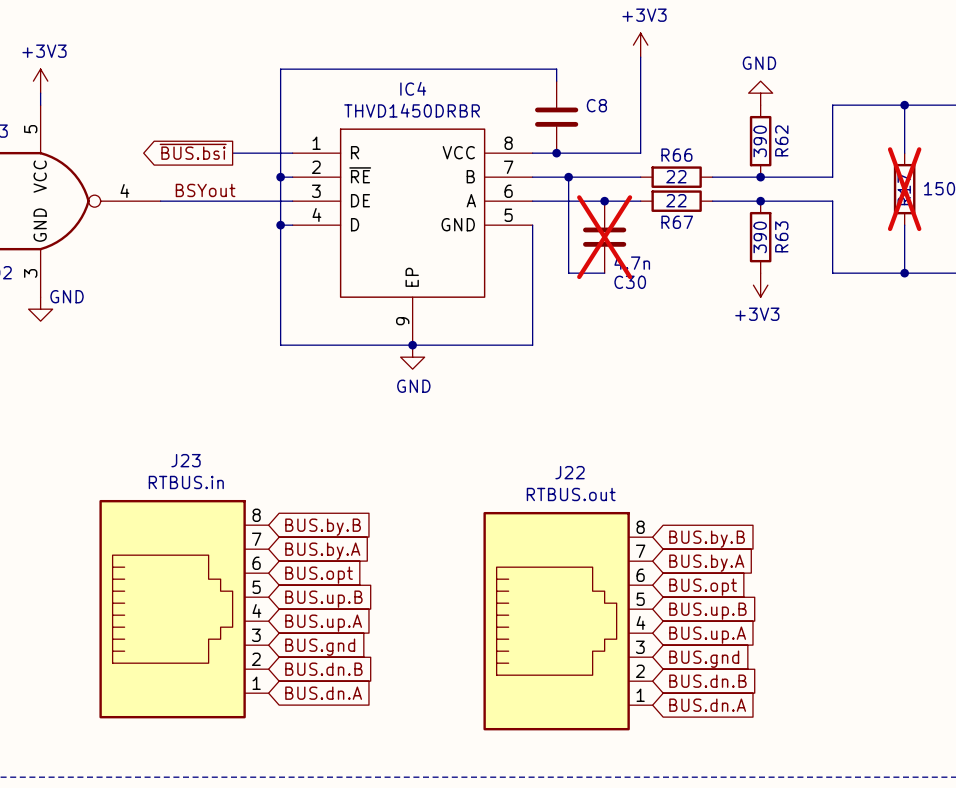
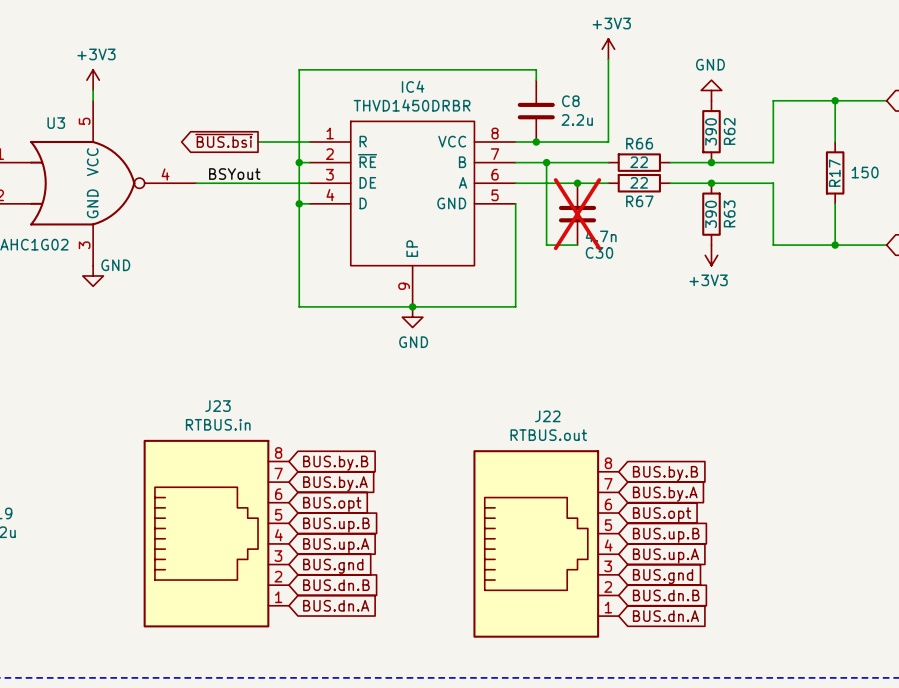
C8 value: none -> 2.2u (577, 119)
R17 do-not-place cross: (904, 189) -> none

